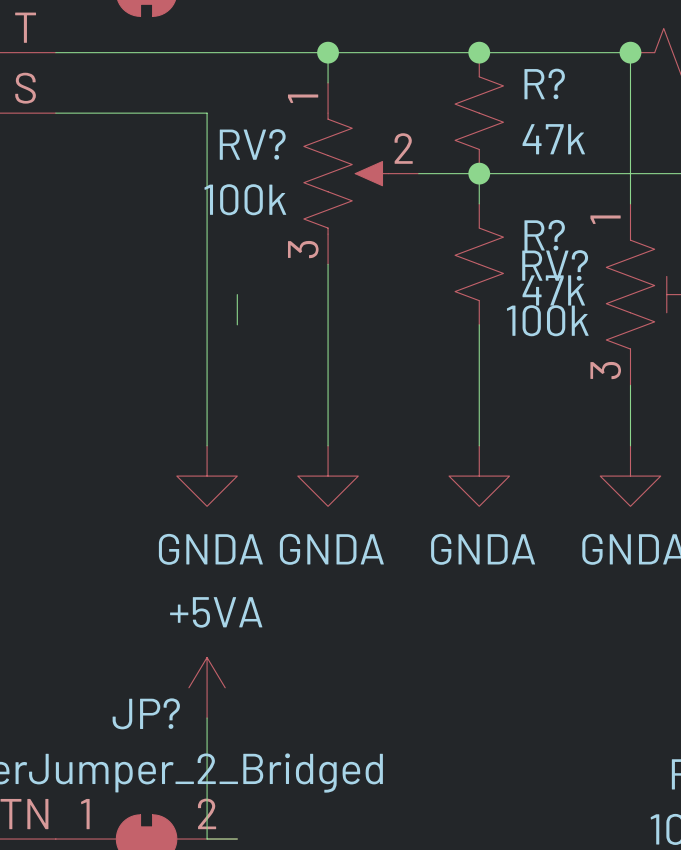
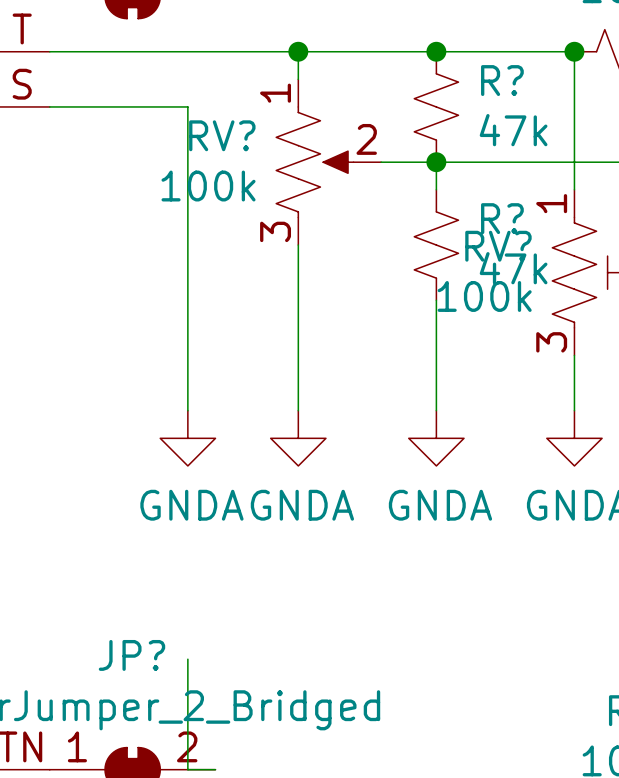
wire: (237, 294) (237, 324) -> none
power symbol: +5VA (207, 687) -> none

